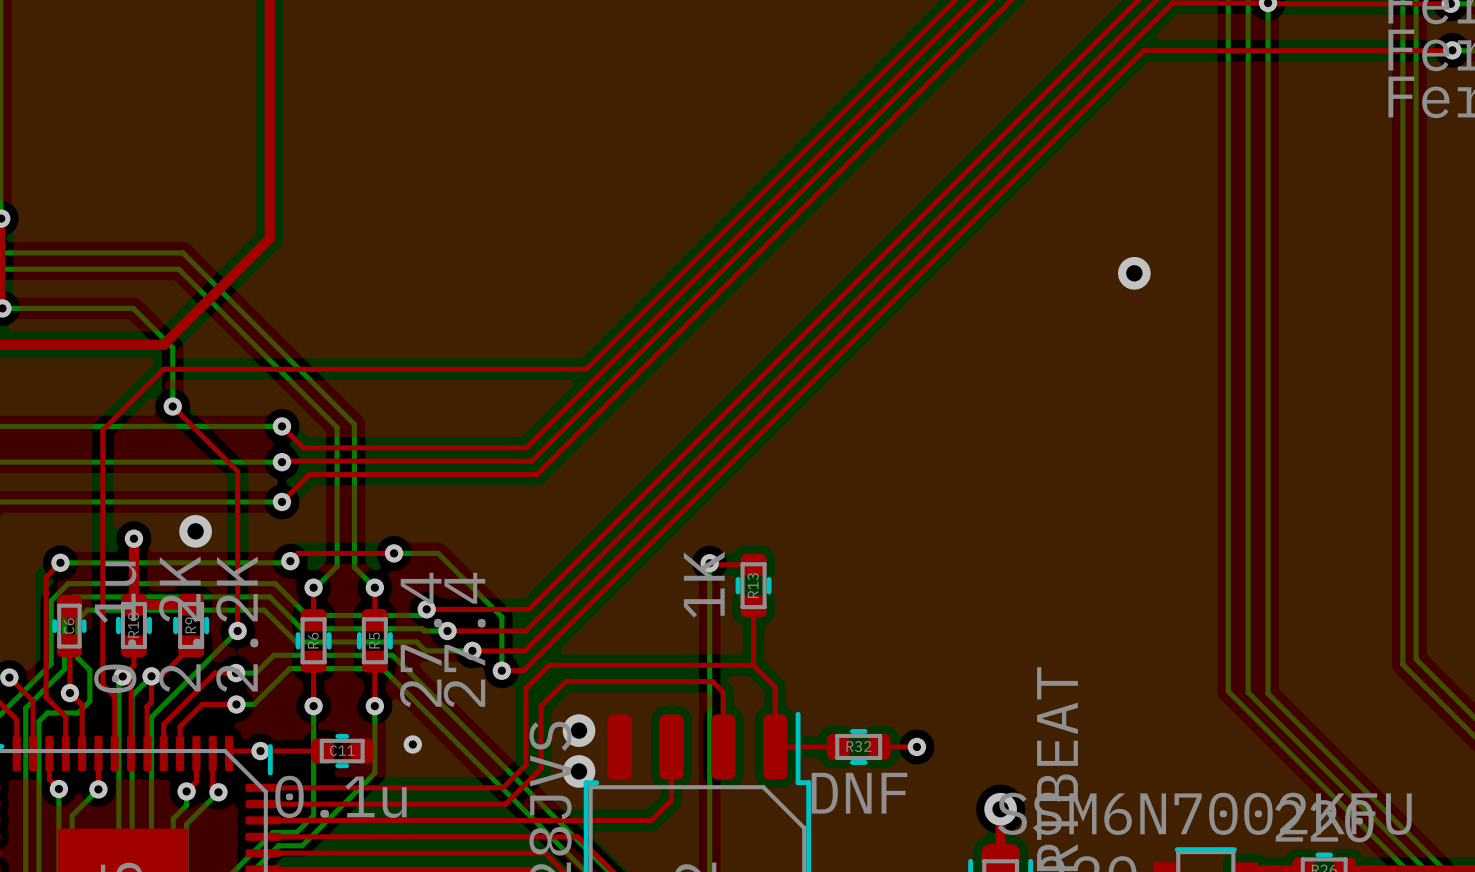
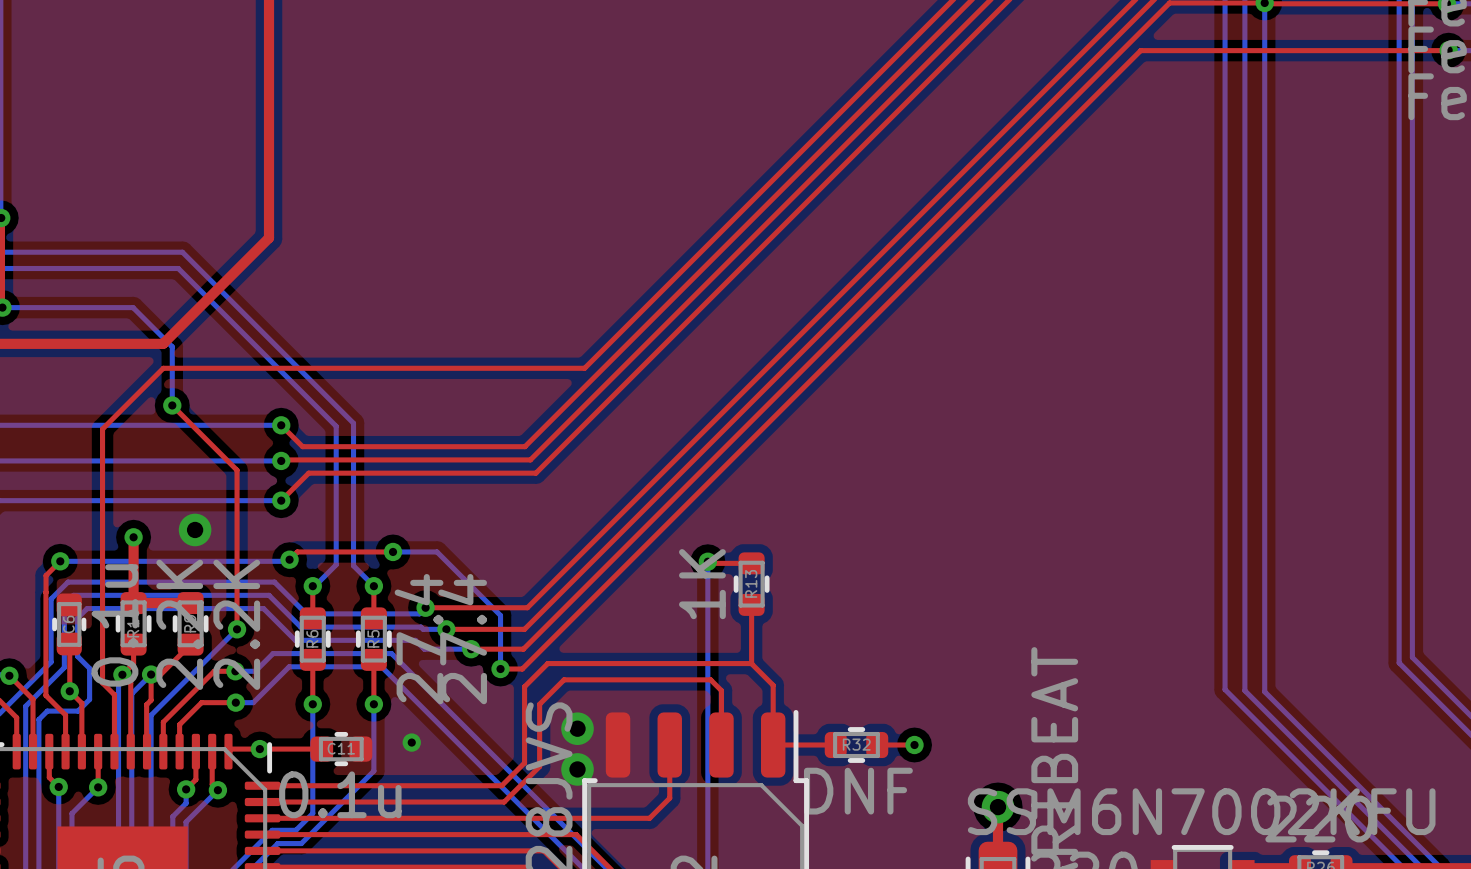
via: (1134, 273) -> none

